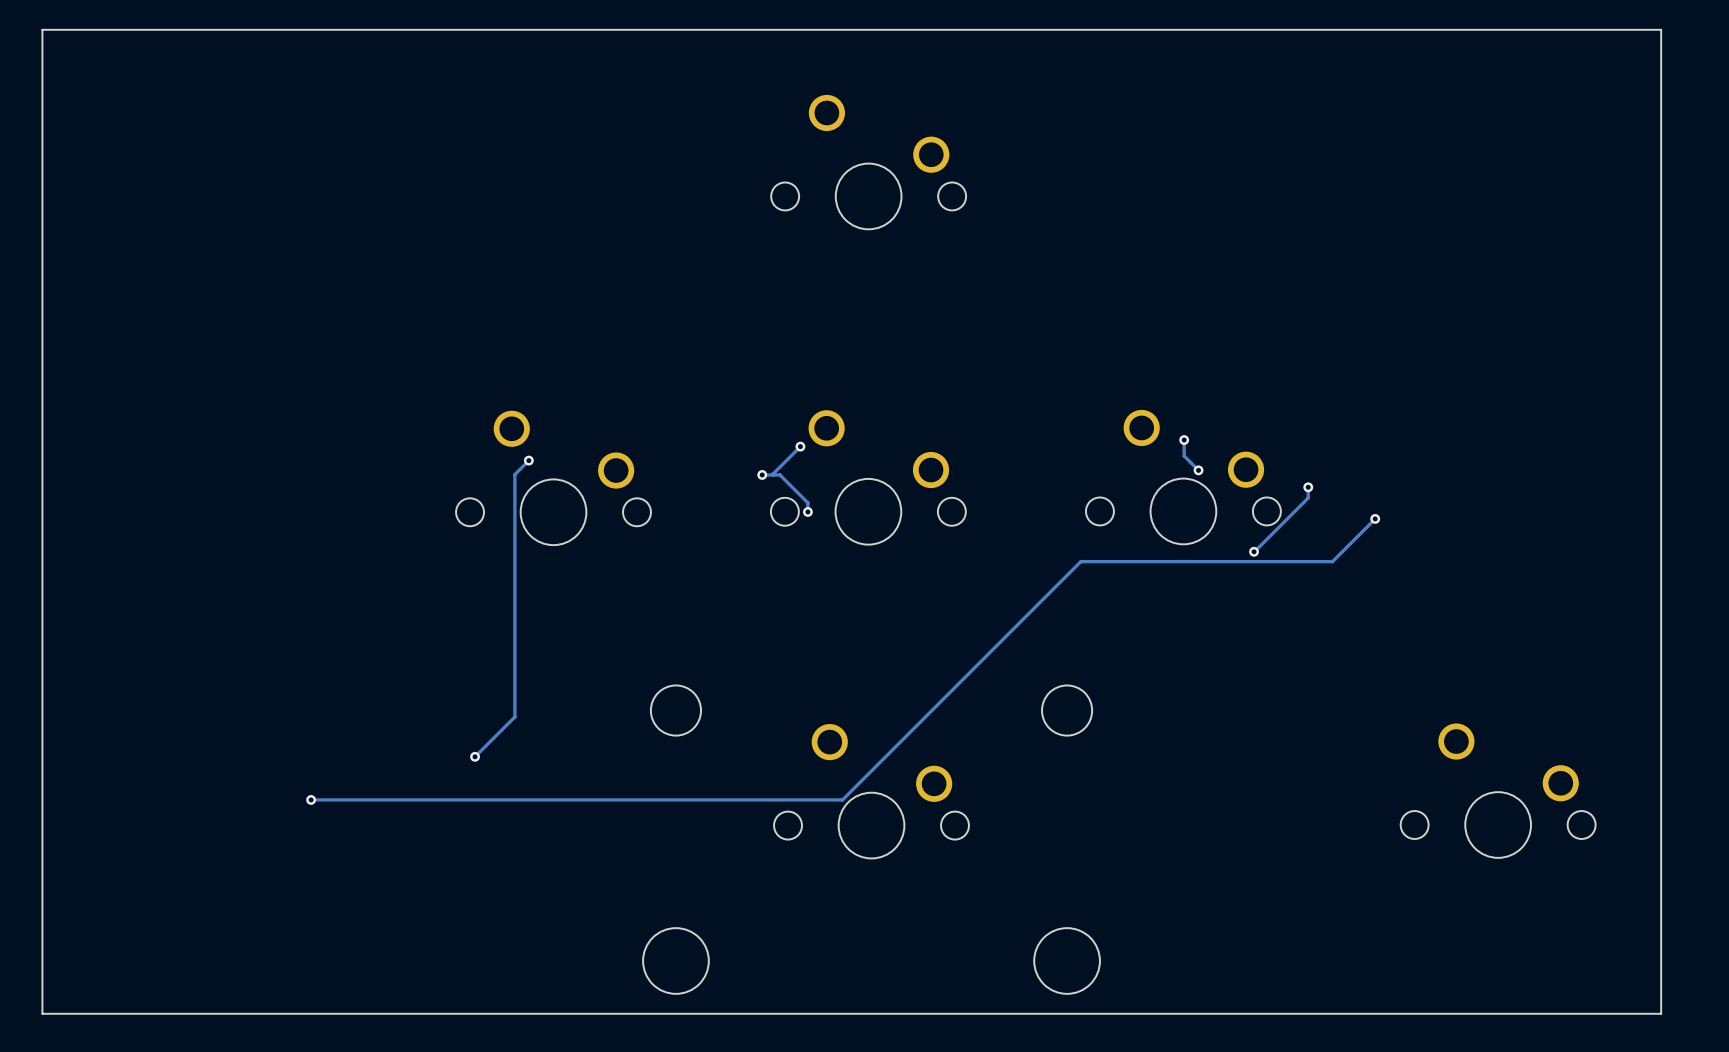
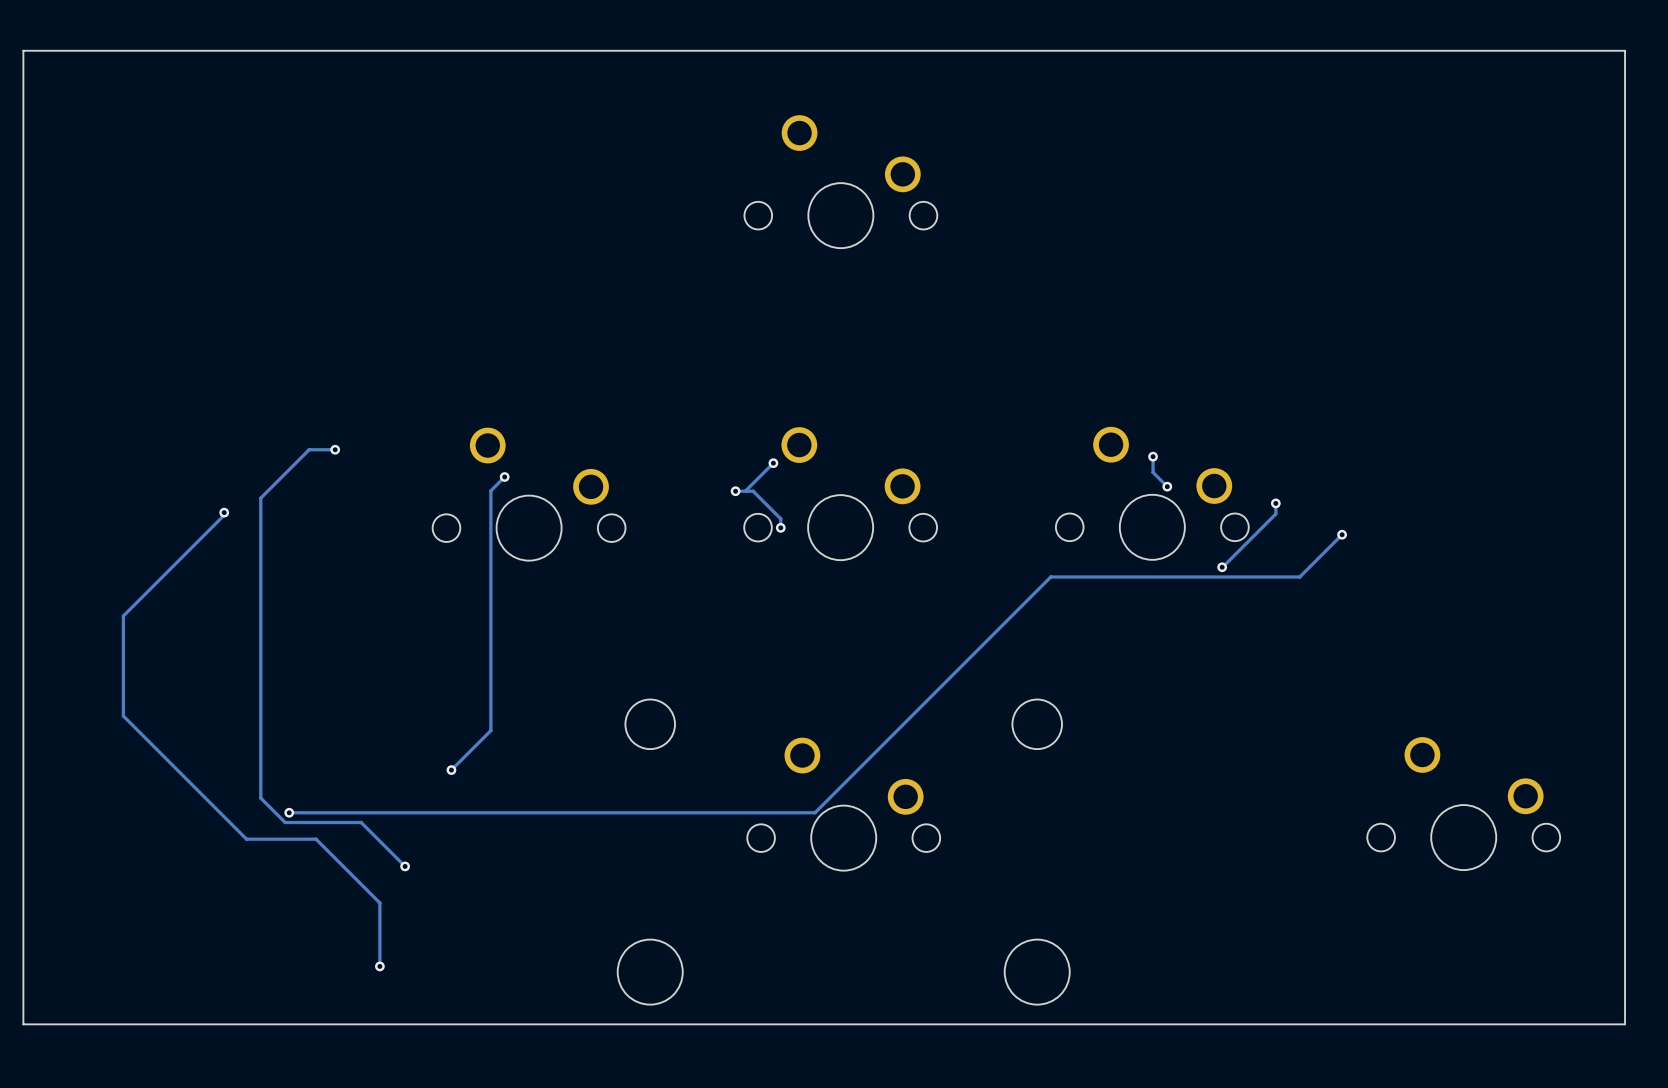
track: none -> (335, 449) (309, 449) (260, 498) (260, 798) (285, 822) (361, 822) (405, 866)
via: none -> (335, 449)
track: none -> (224, 512) (224, 515) (123, 616) (123, 716) (246, 839) (316, 839) (379, 903) (379, 966)
via: none -> (224, 512)
via: none -> (405, 866)
via: none -> (379, 966)

